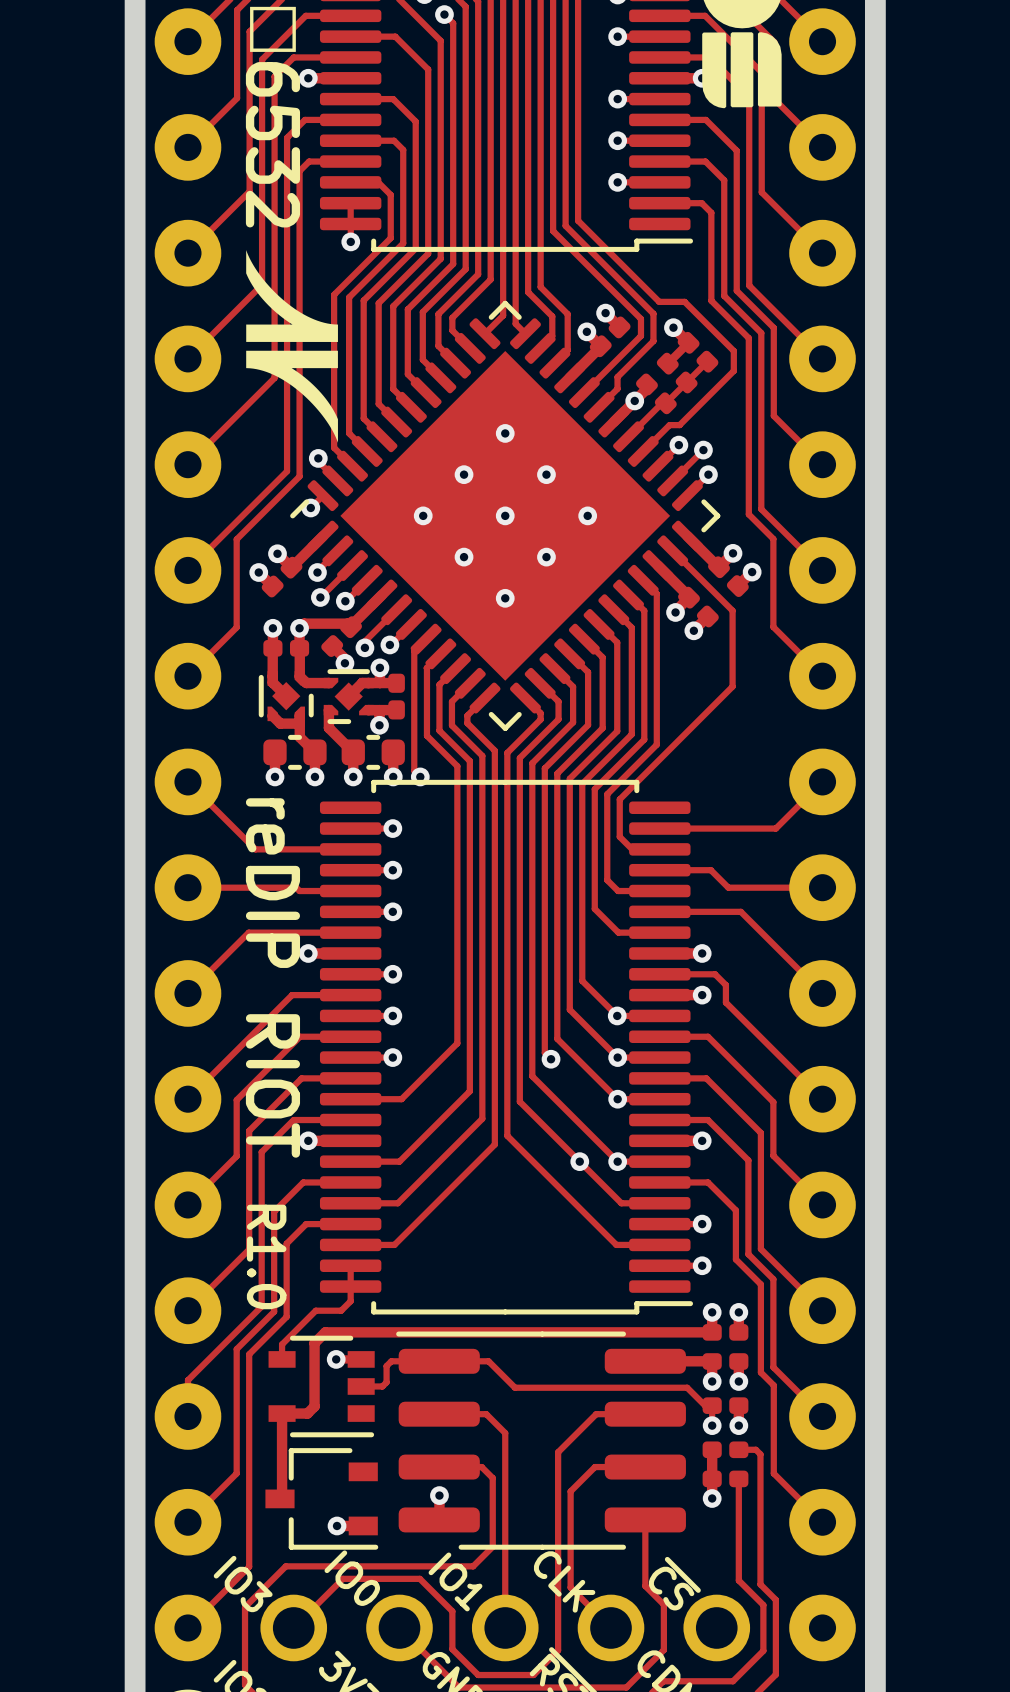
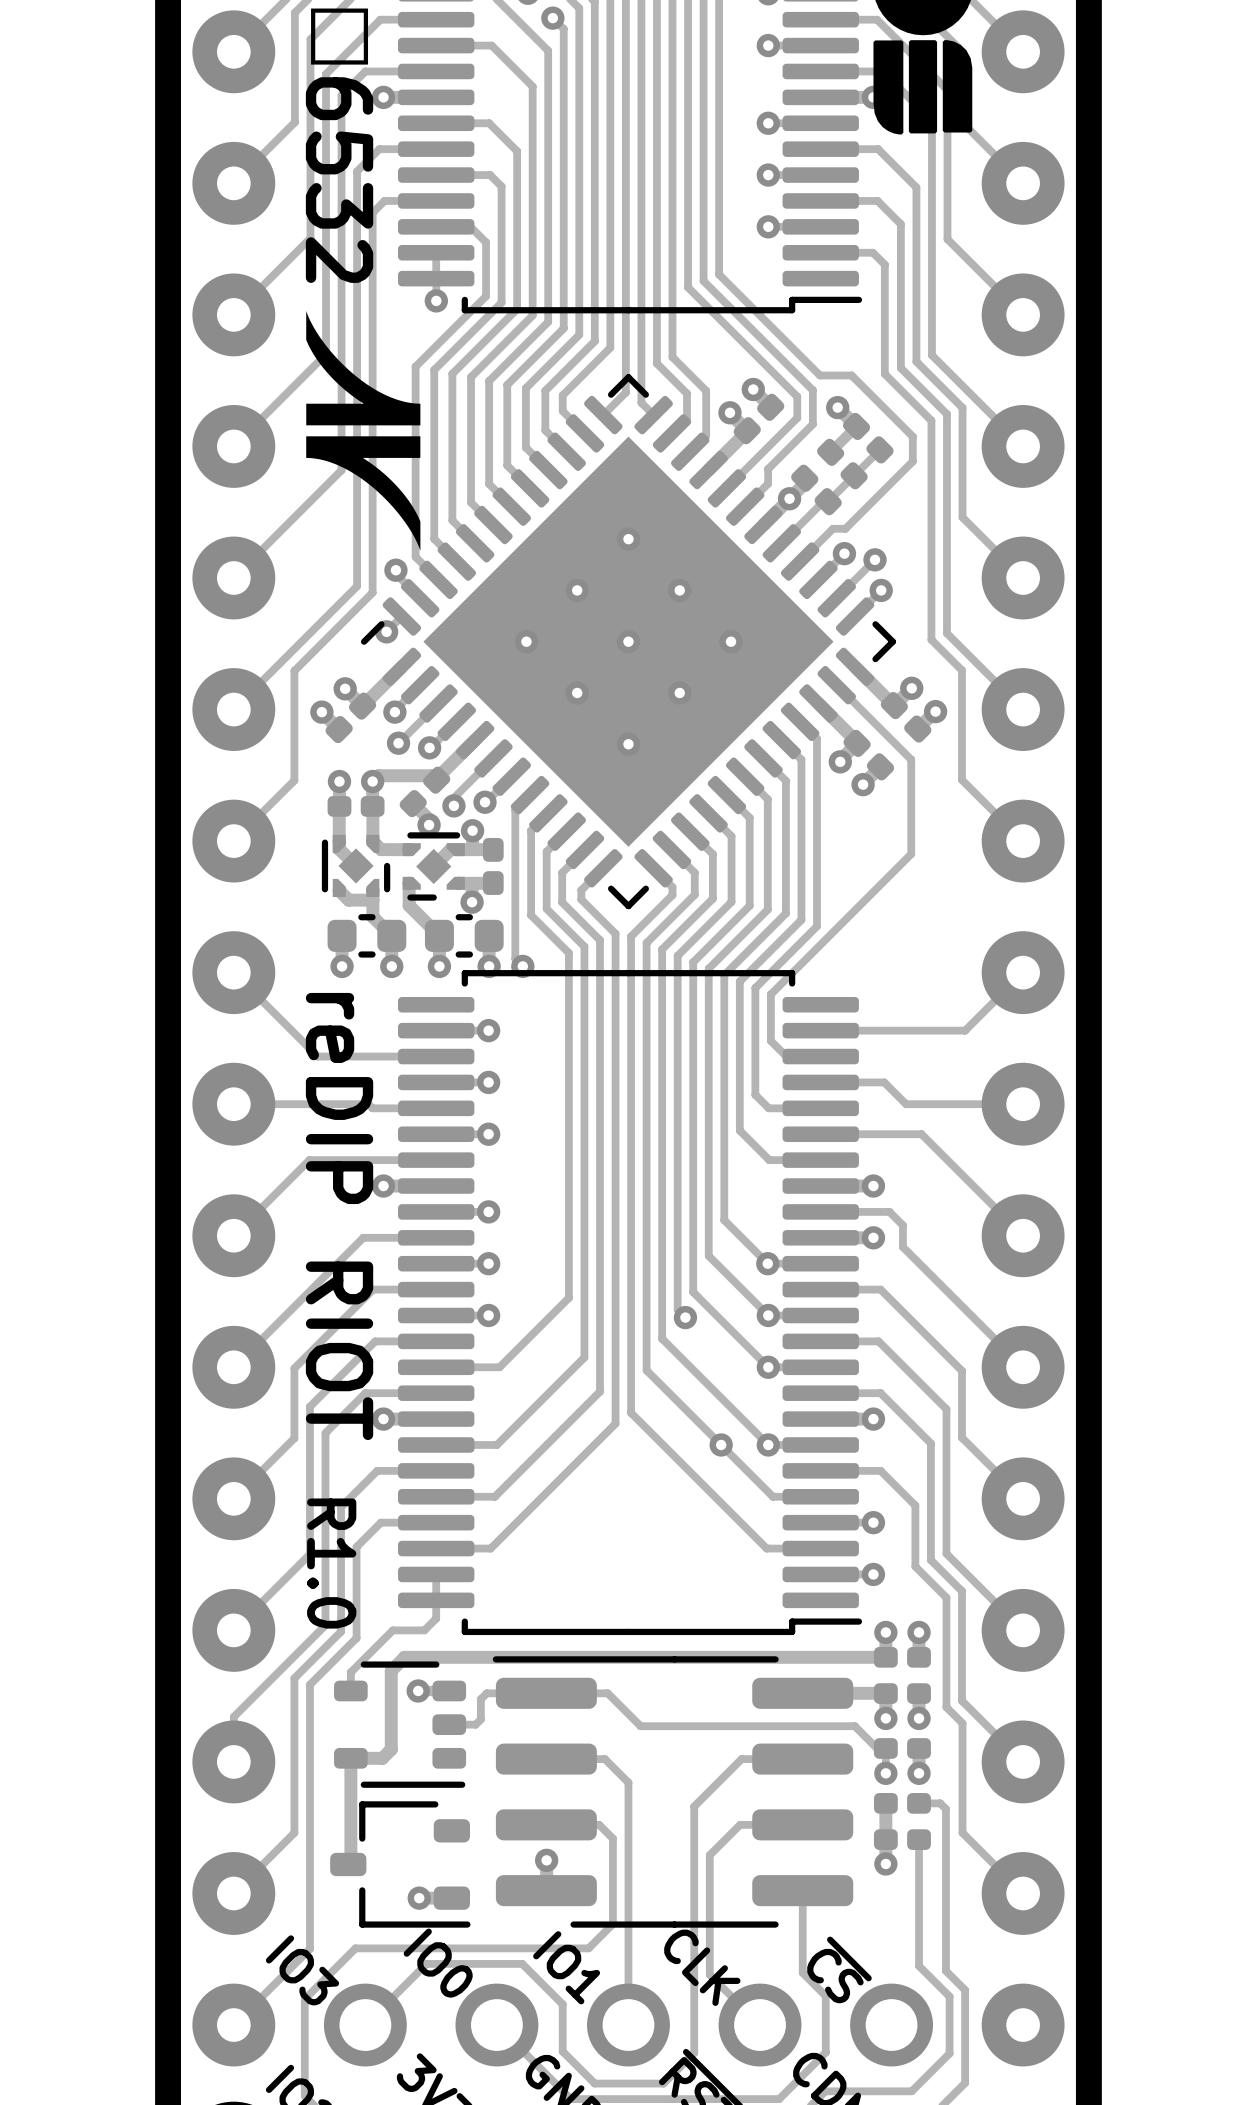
part footprint: [268, 1335, 375, 1438] -> [334, 1661, 467, 1788]
part footprint: [265, 1448, 379, 1550] -> [330, 1801, 471, 1928]

